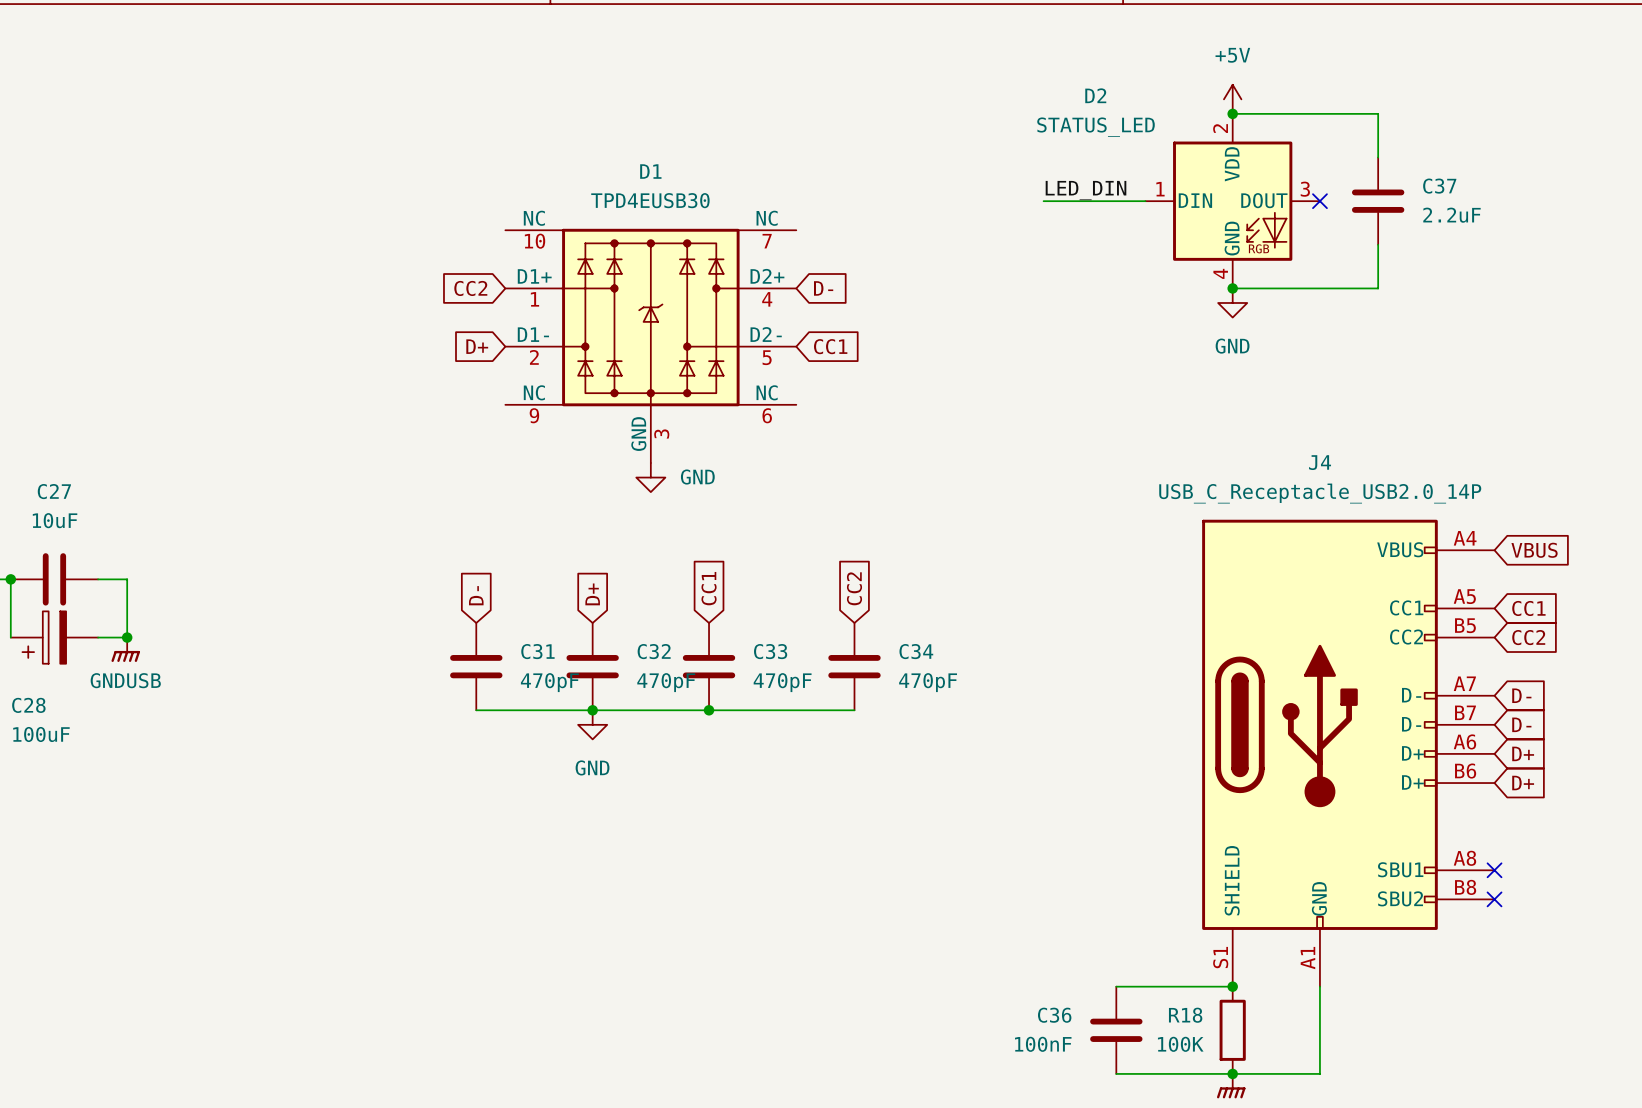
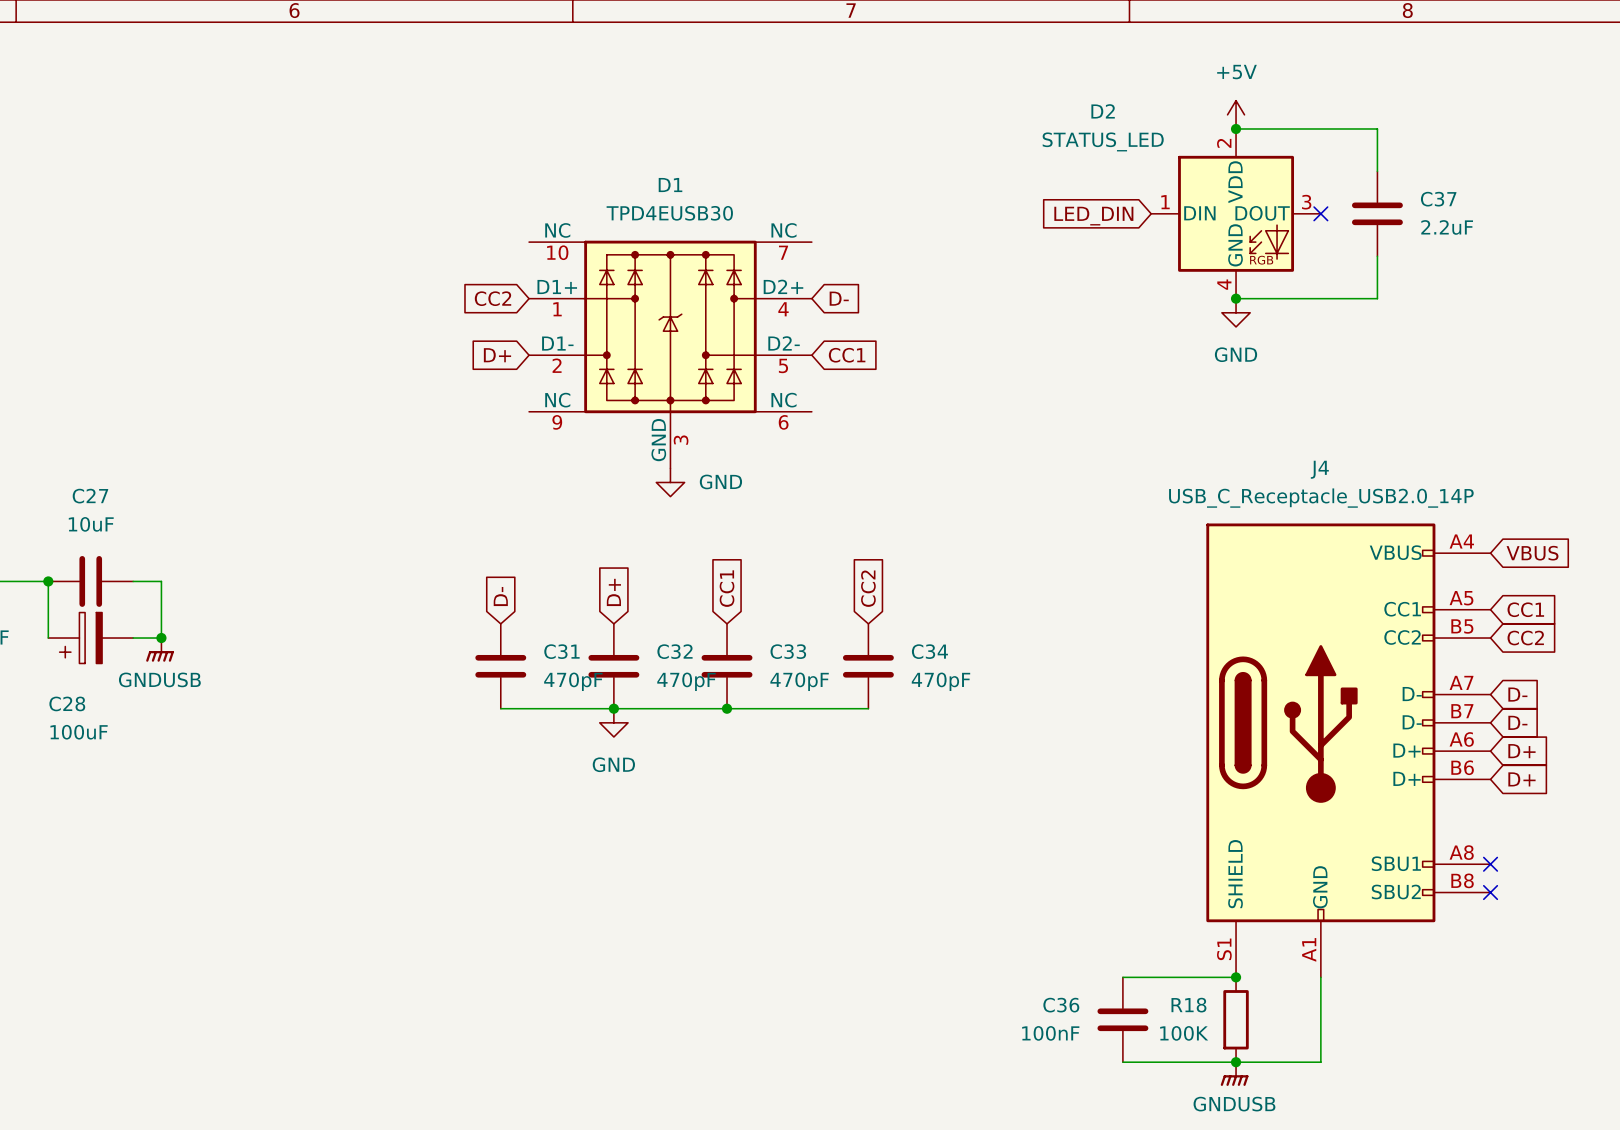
label: LED_DIN (1086, 190) -> none
wire: (1043, 201) (1145, 201) -> none
global label: none -> LED_DIN (1093, 216)

